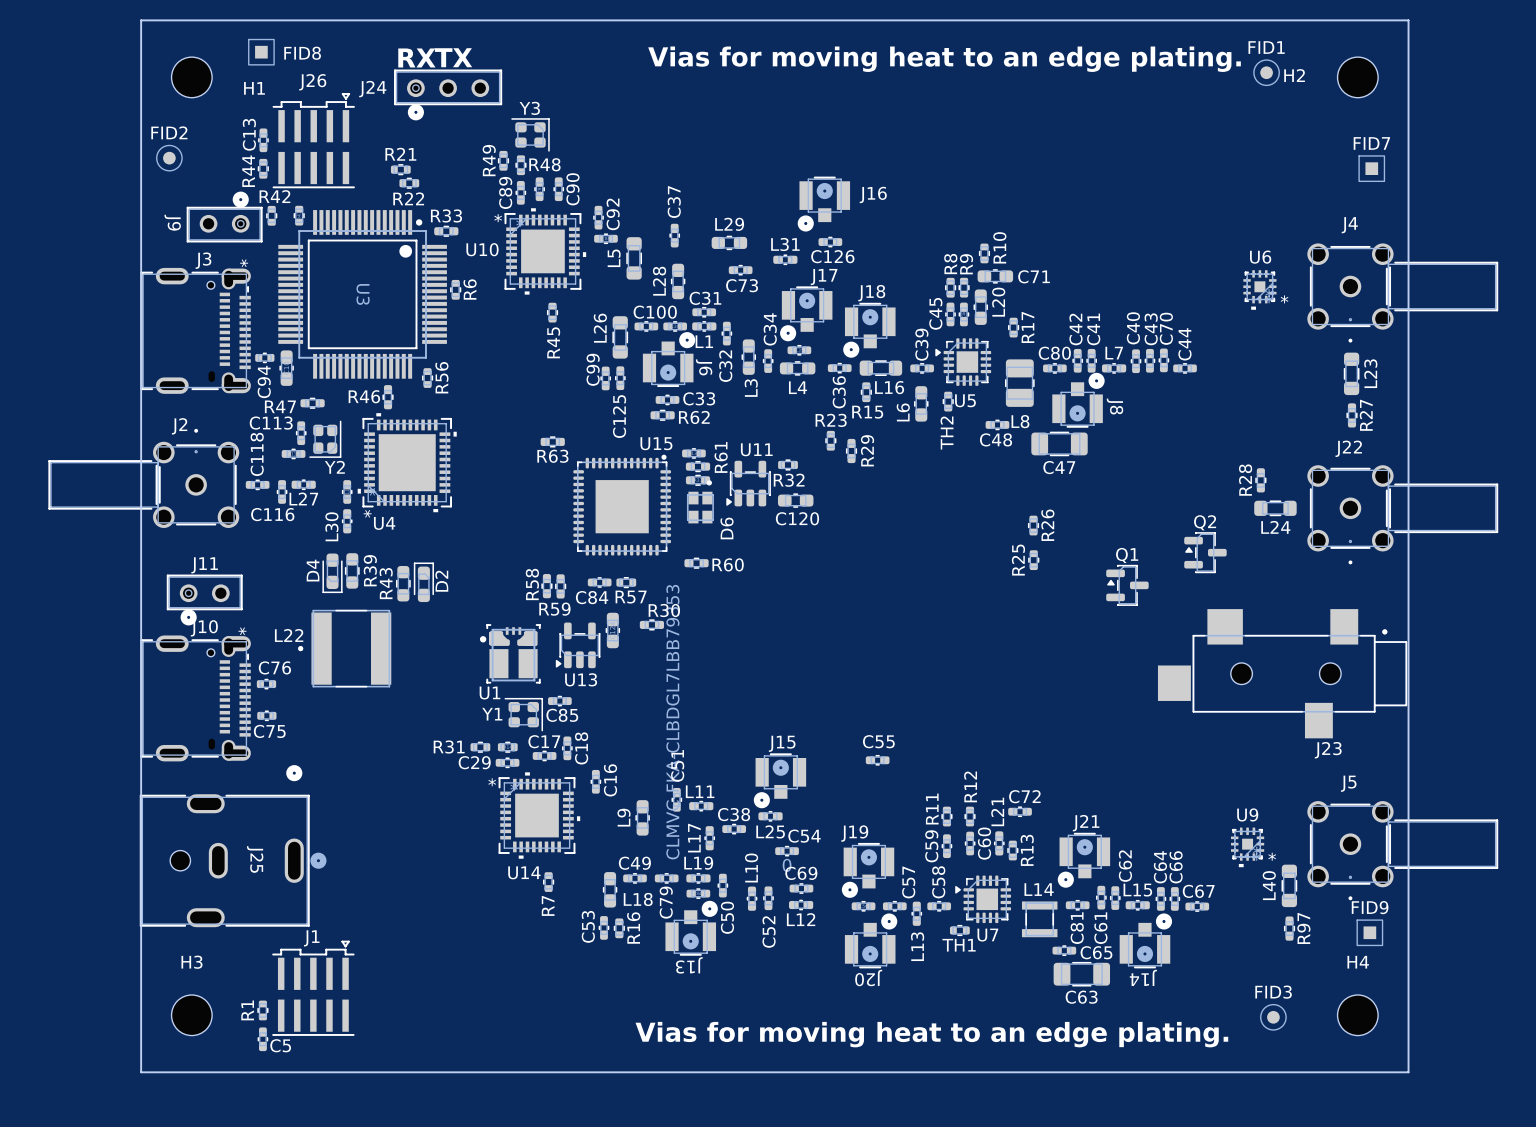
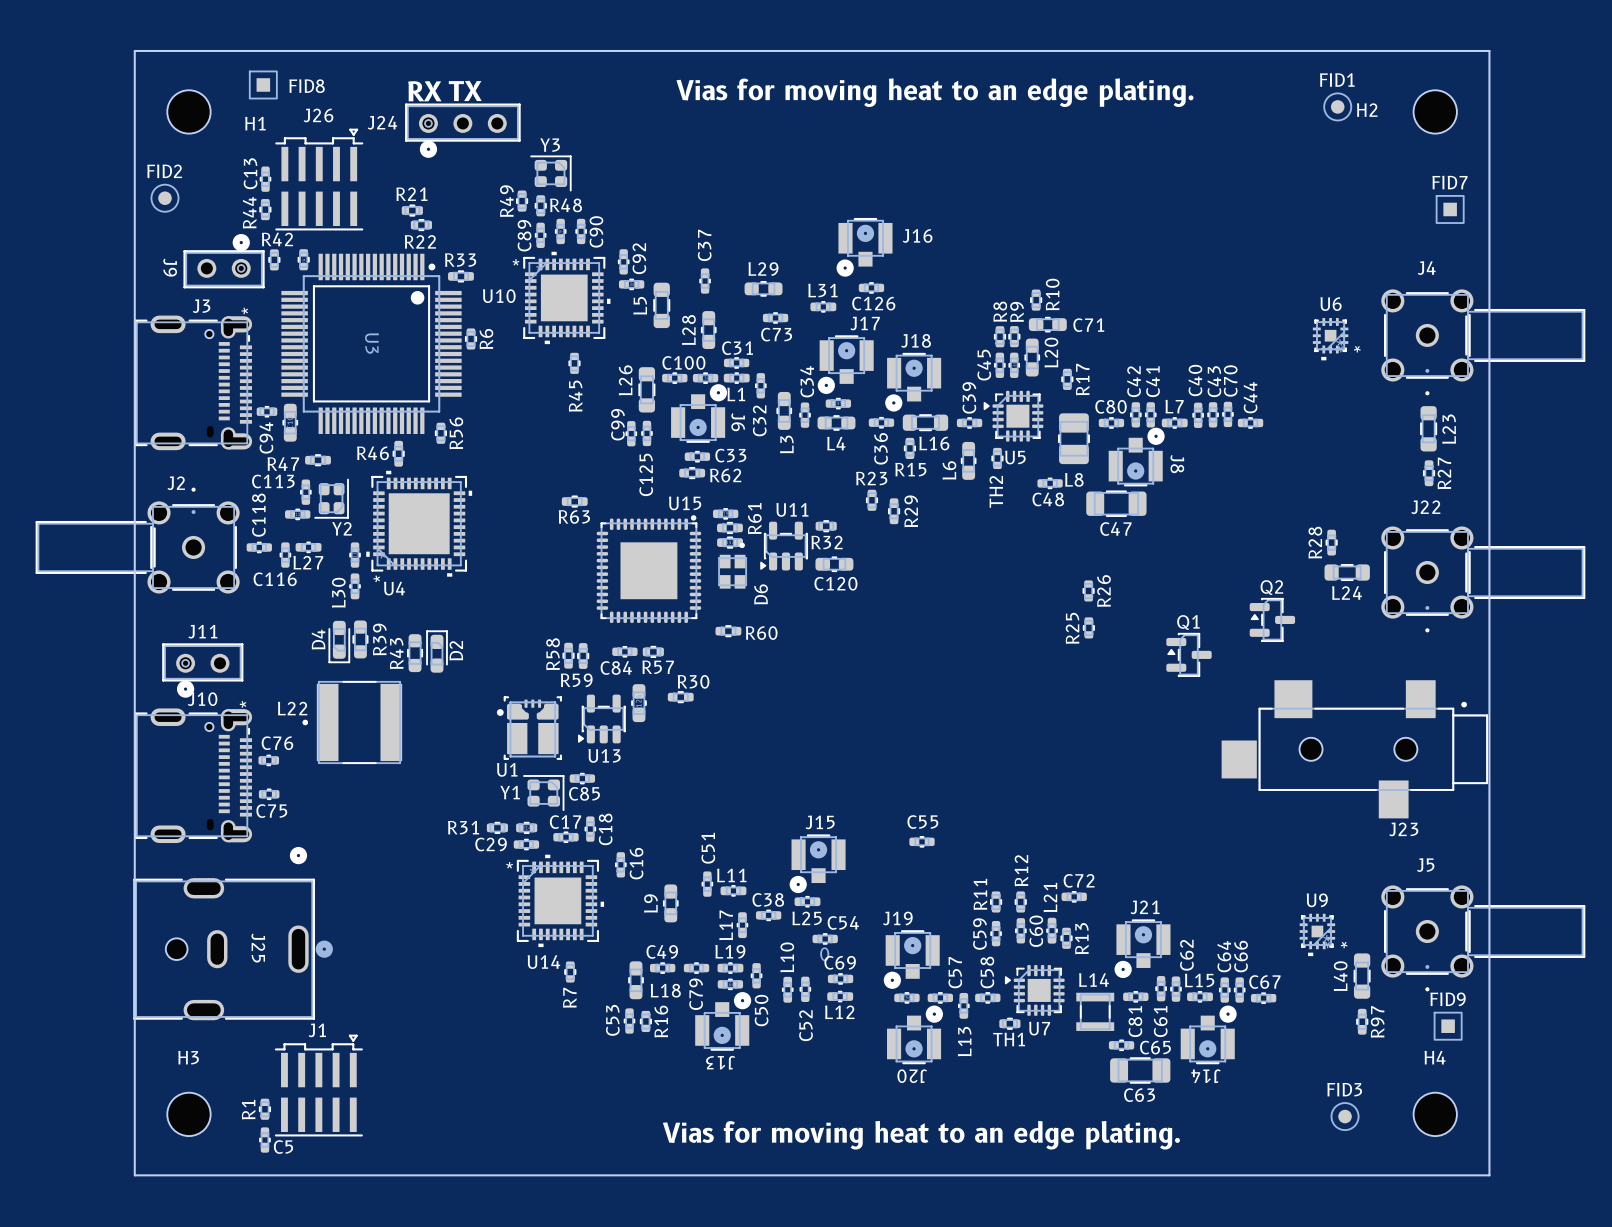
D6 value: CLMVC-FKA-CLBDGL7LBB79353 (672, 722) -> none

